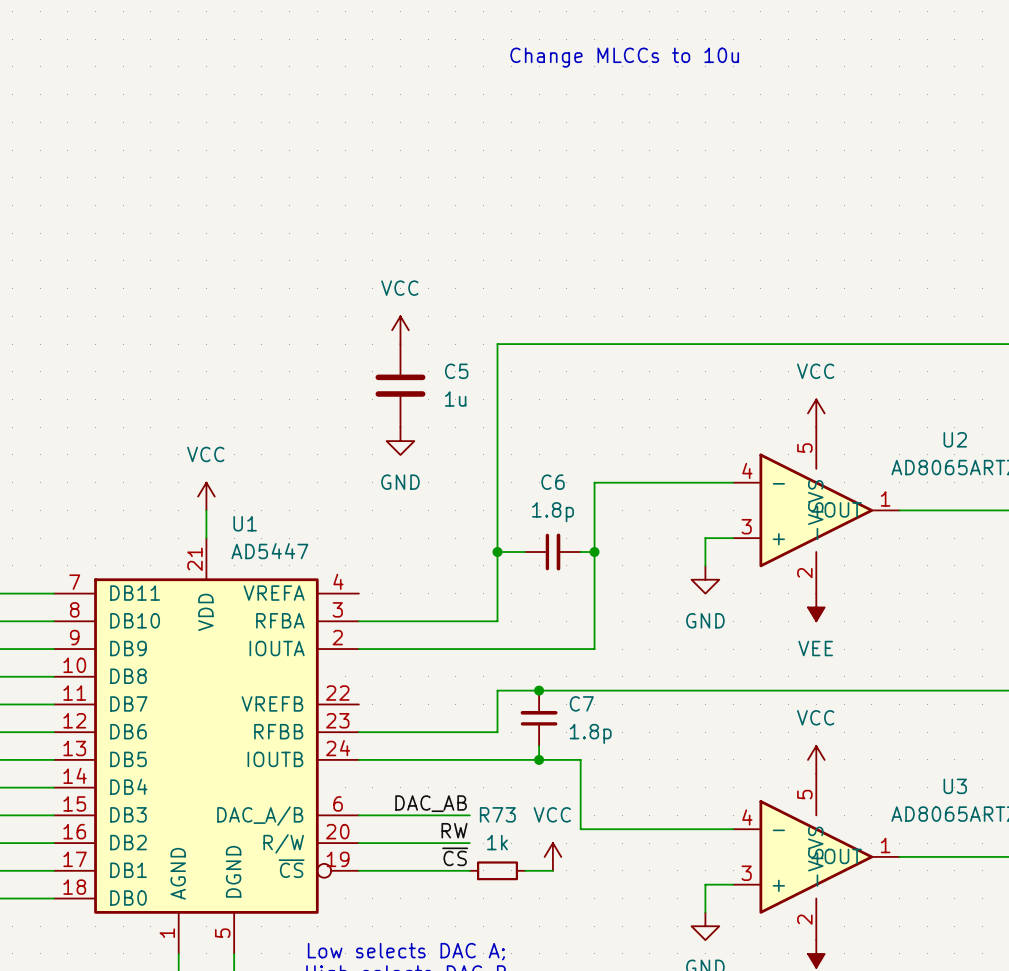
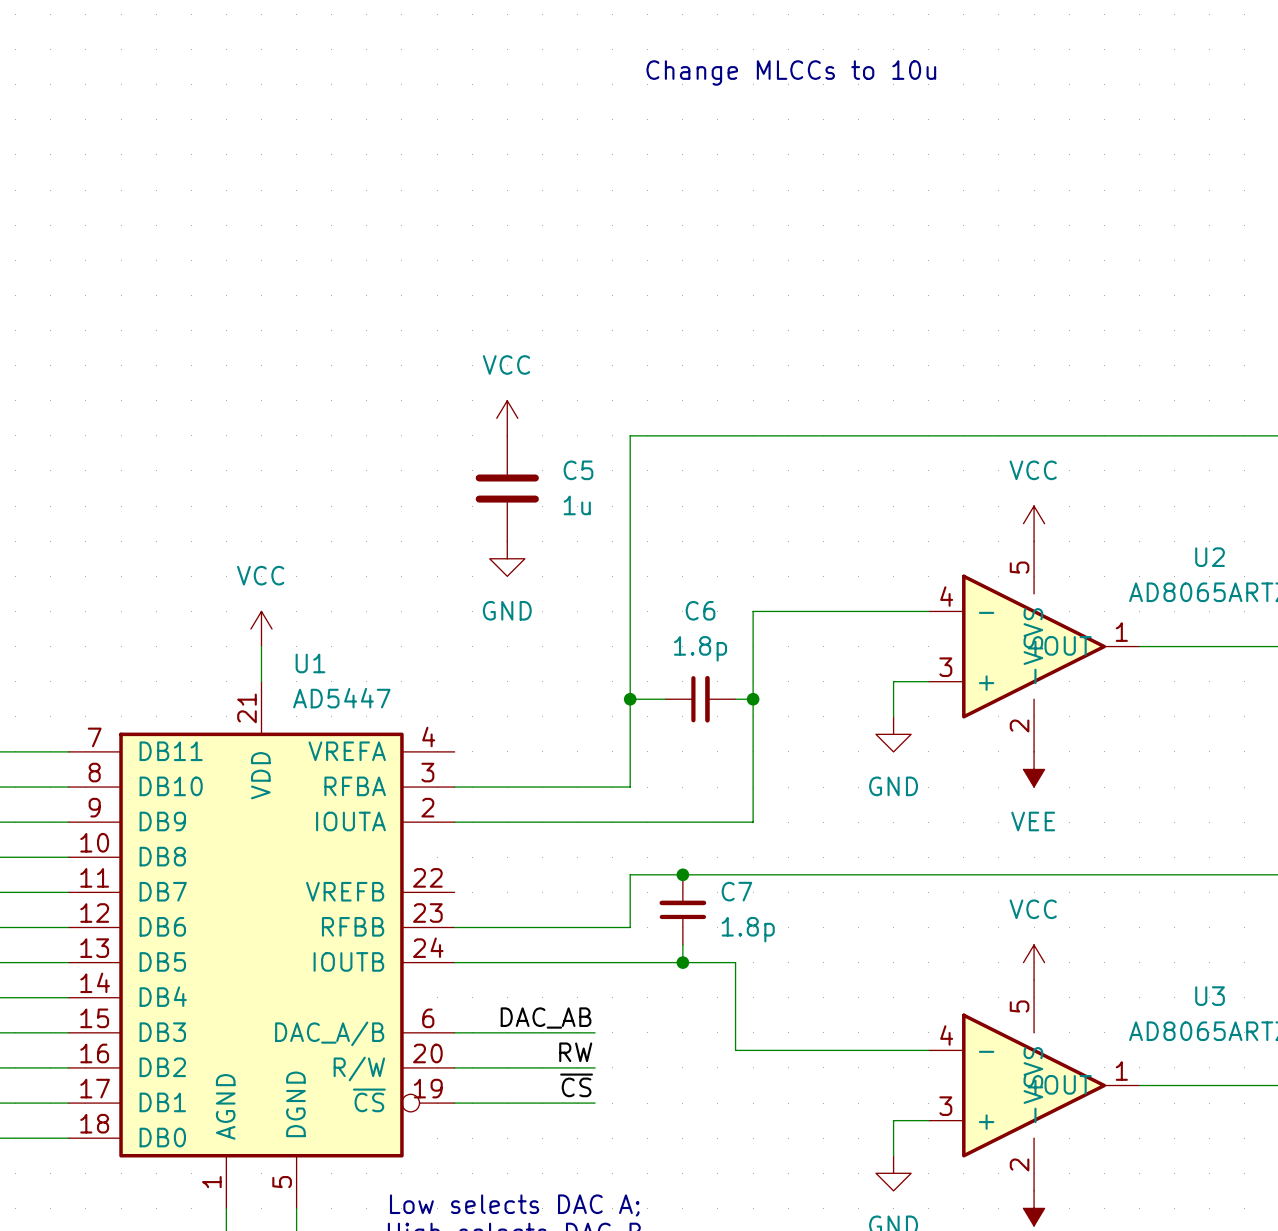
power symbol: VCC (552, 856) -> none
R73: 1k (497, 870) -> none
wire: (525, 870) (552, 870) -> none

